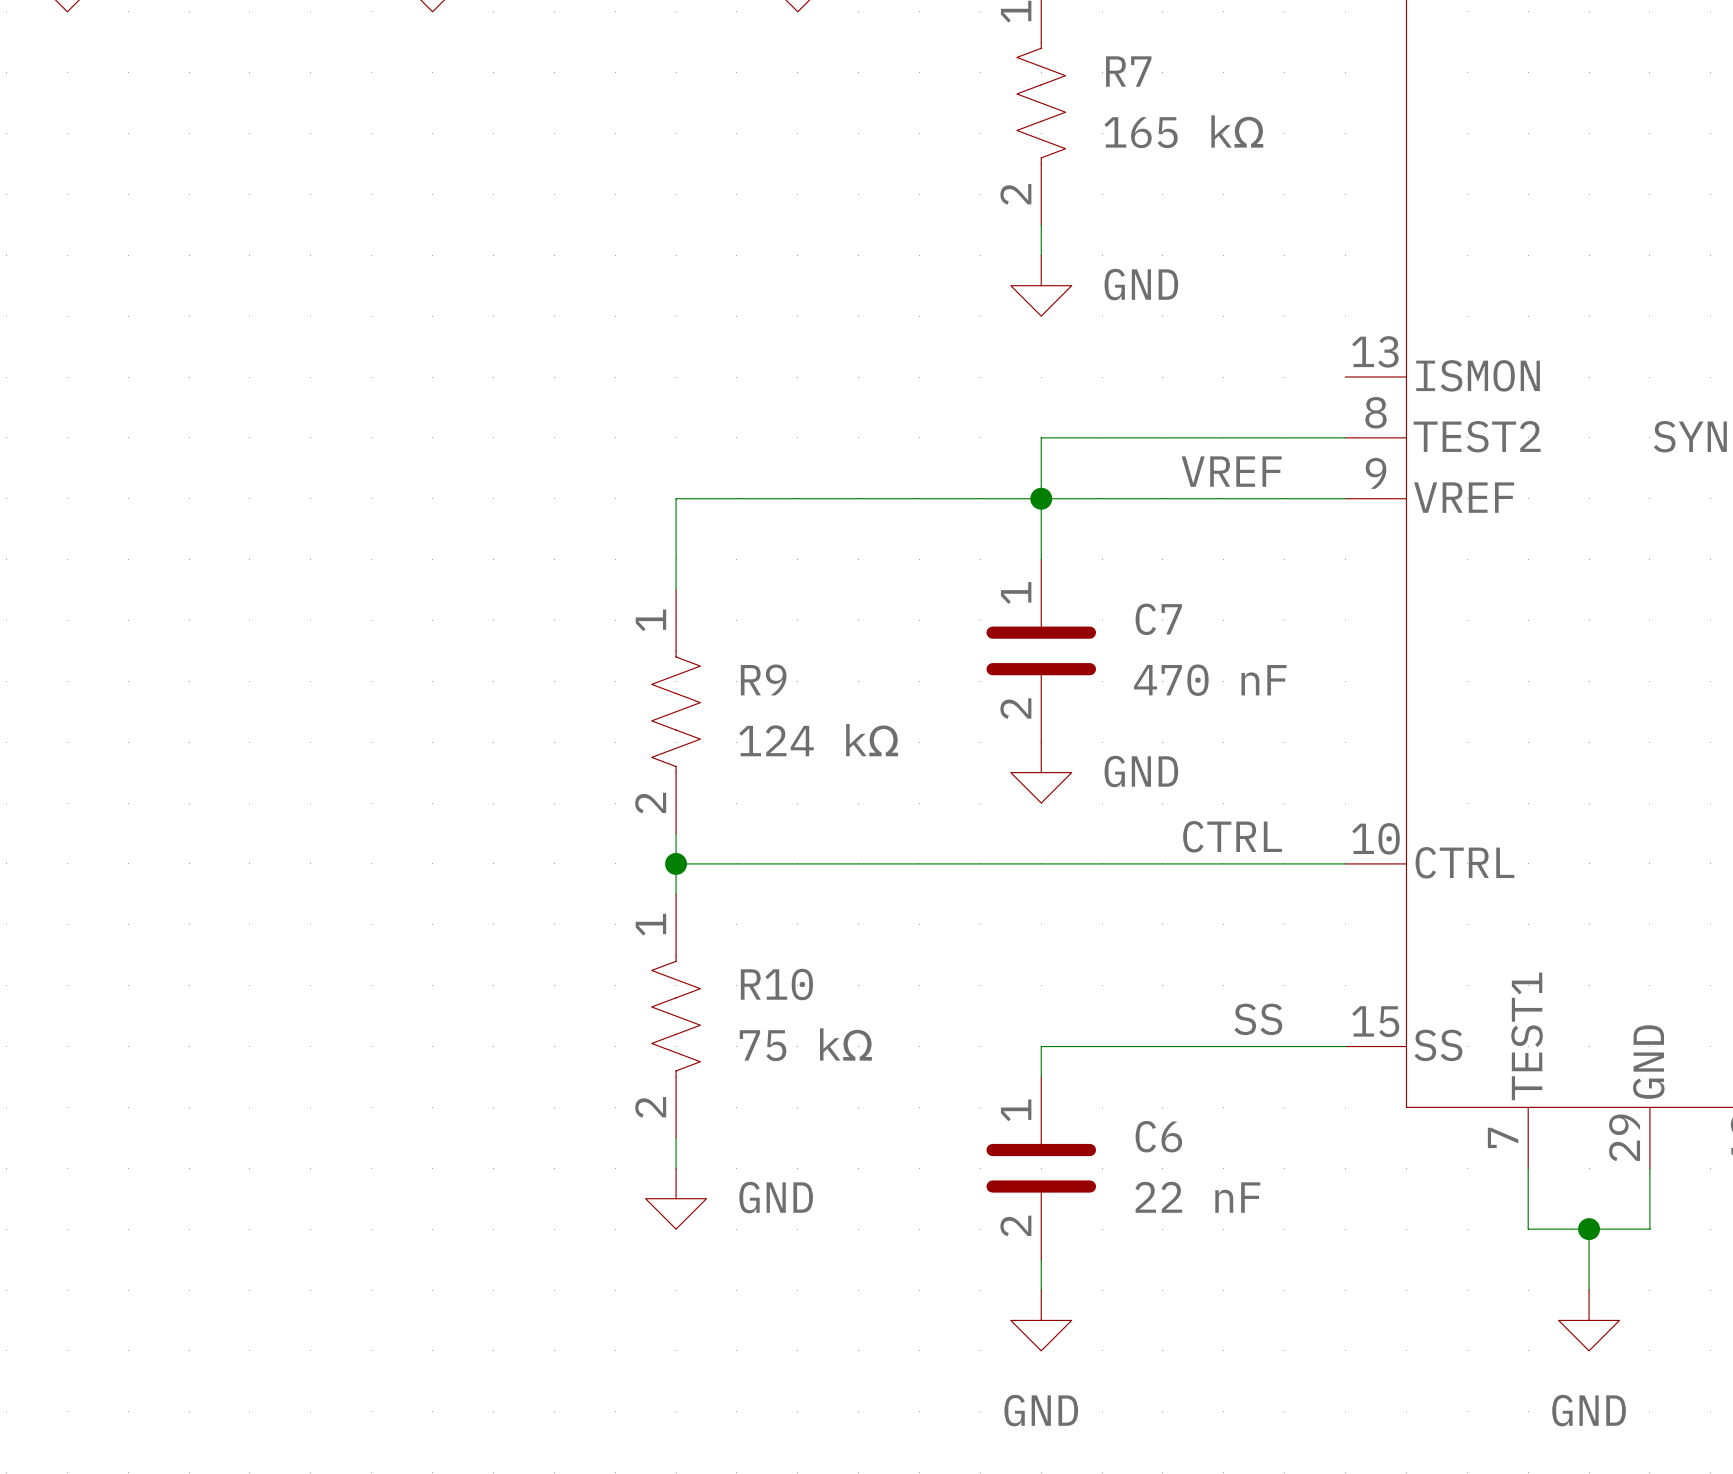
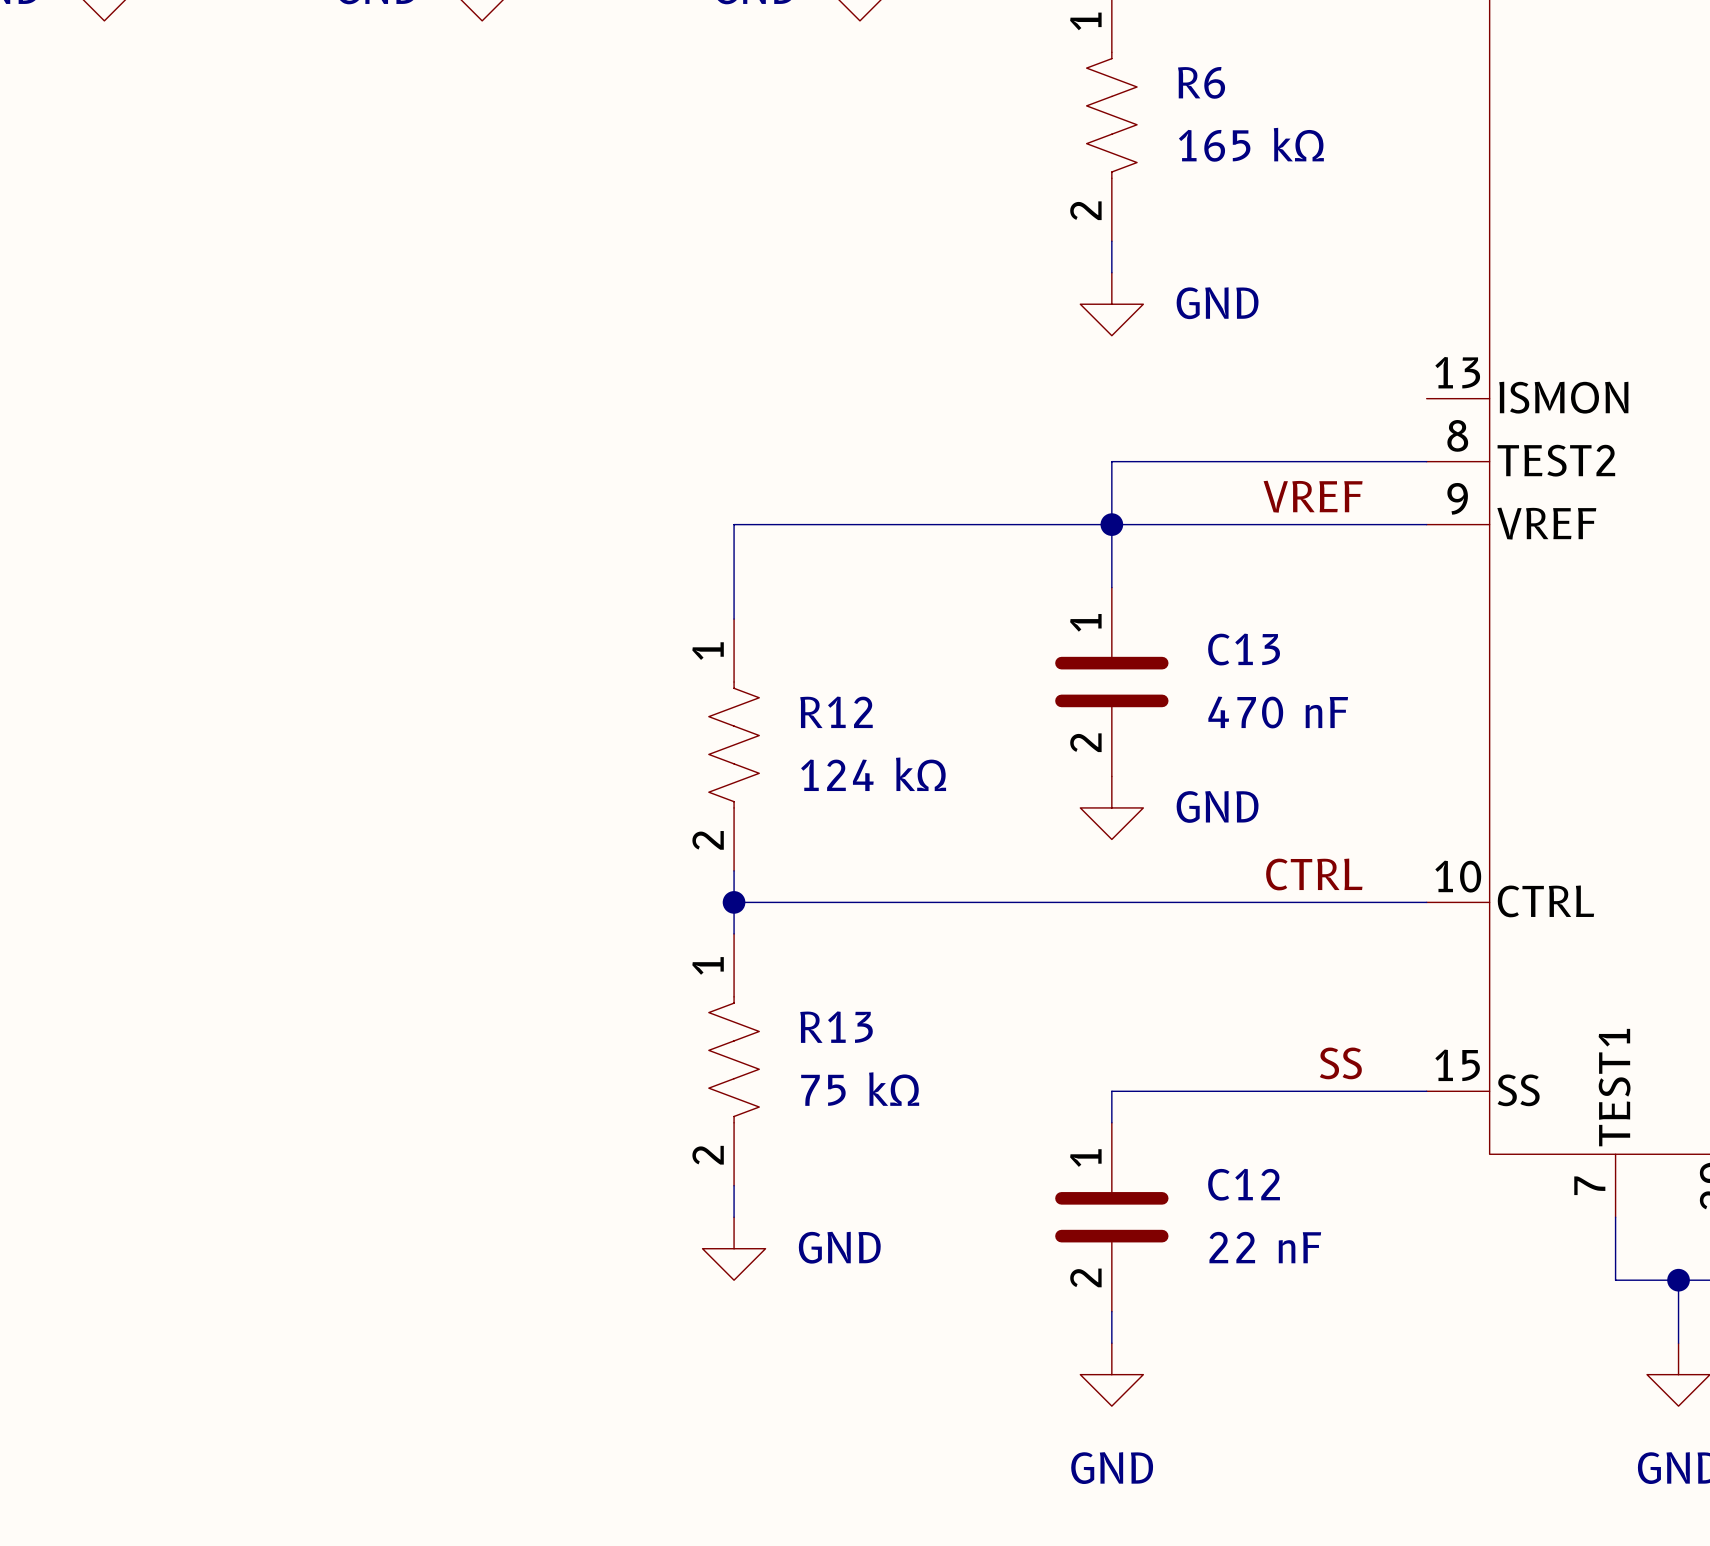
R7 name: R7 (1128, 71) -> R6 (1201, 82)
C7 name: C7 (1158, 619) -> C13 (1244, 649)
R9 name: R9 (763, 679) -> R12 (836, 712)
R10 name: R10 (776, 984) -> R13 (836, 1027)
C6 name: C6 (1158, 1136) -> C12 (1244, 1184)

